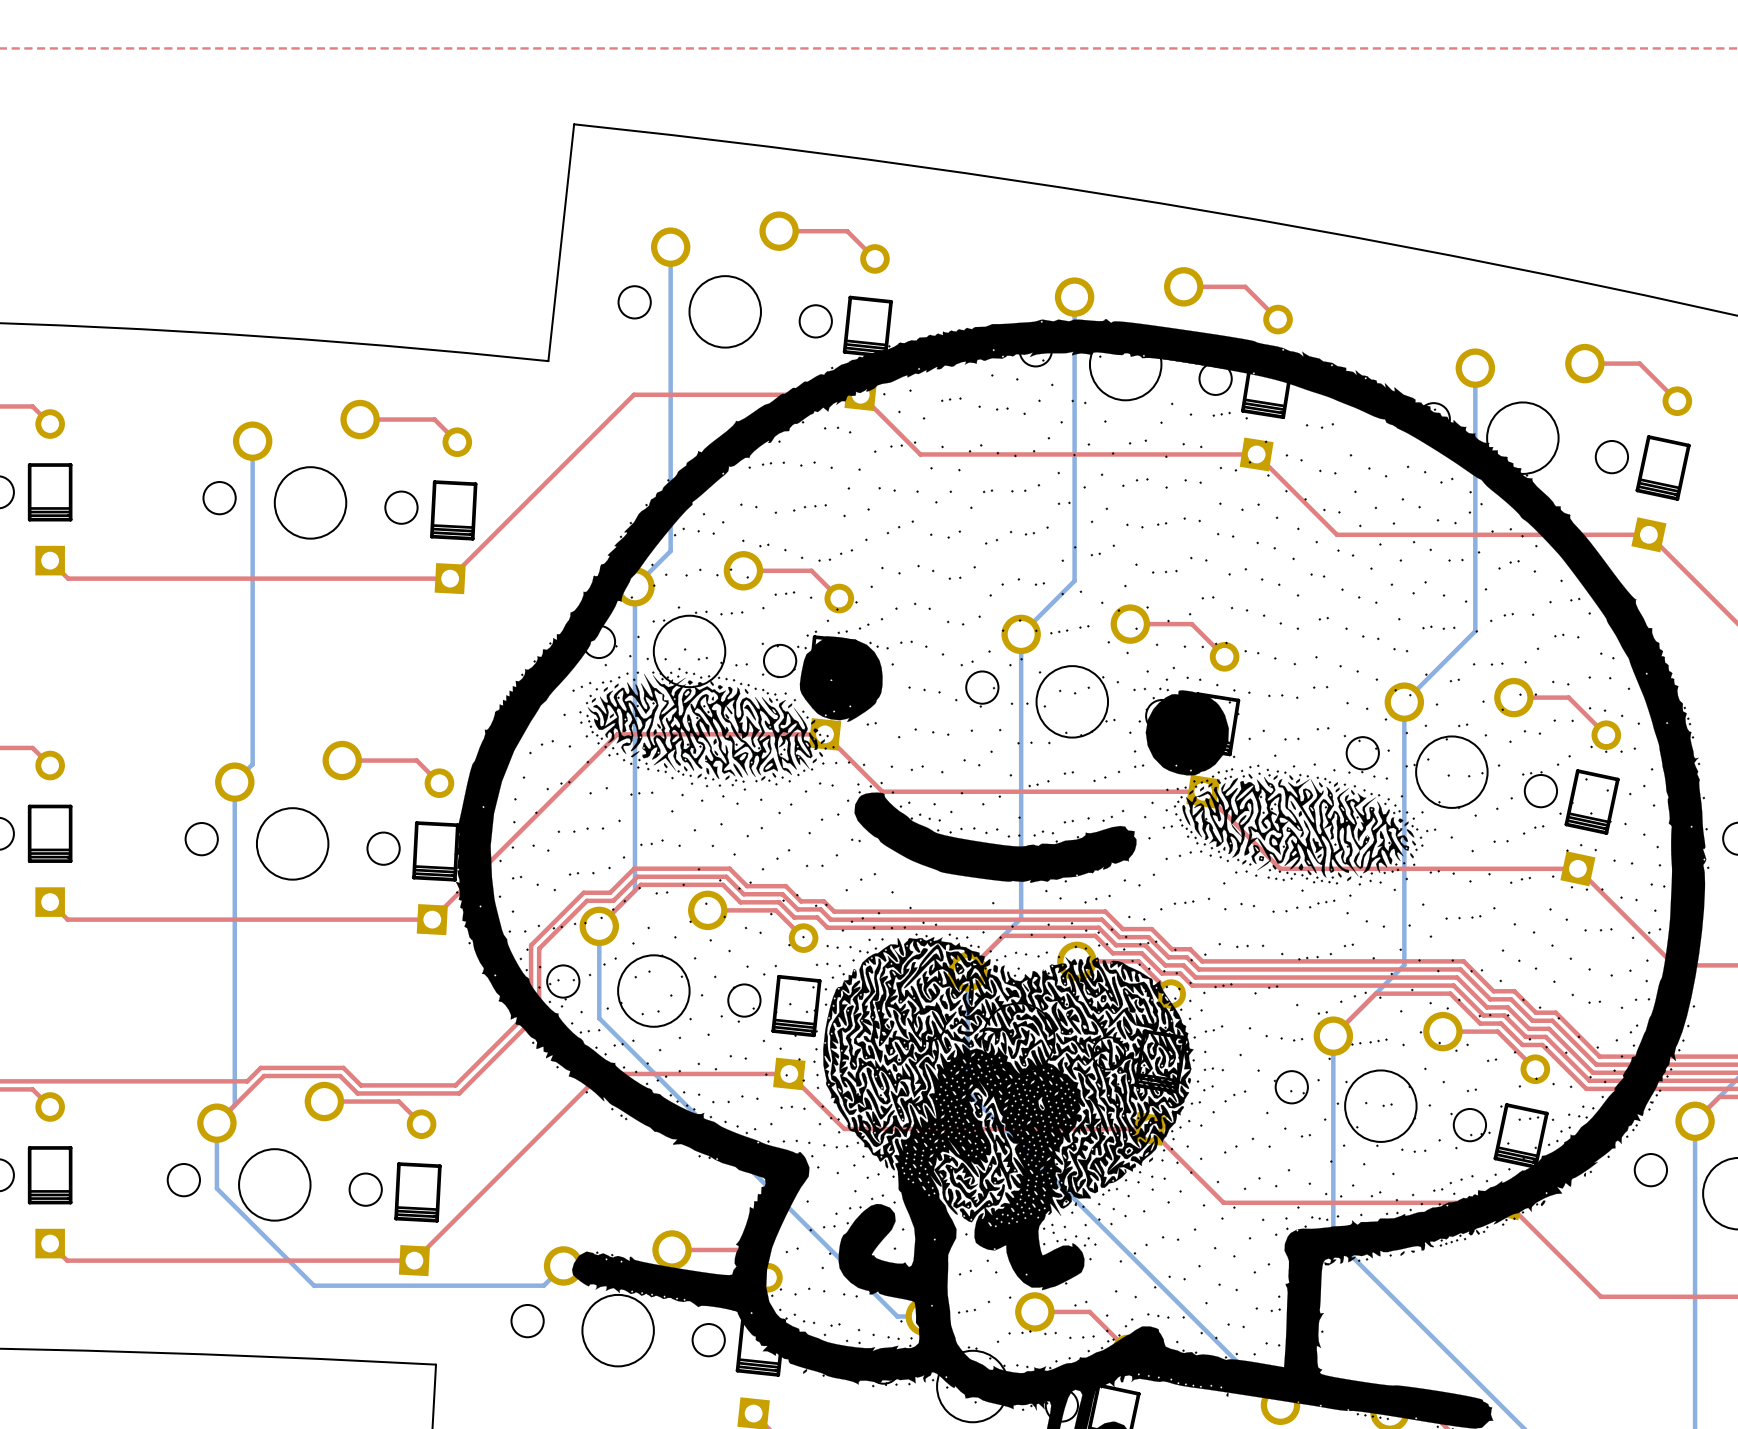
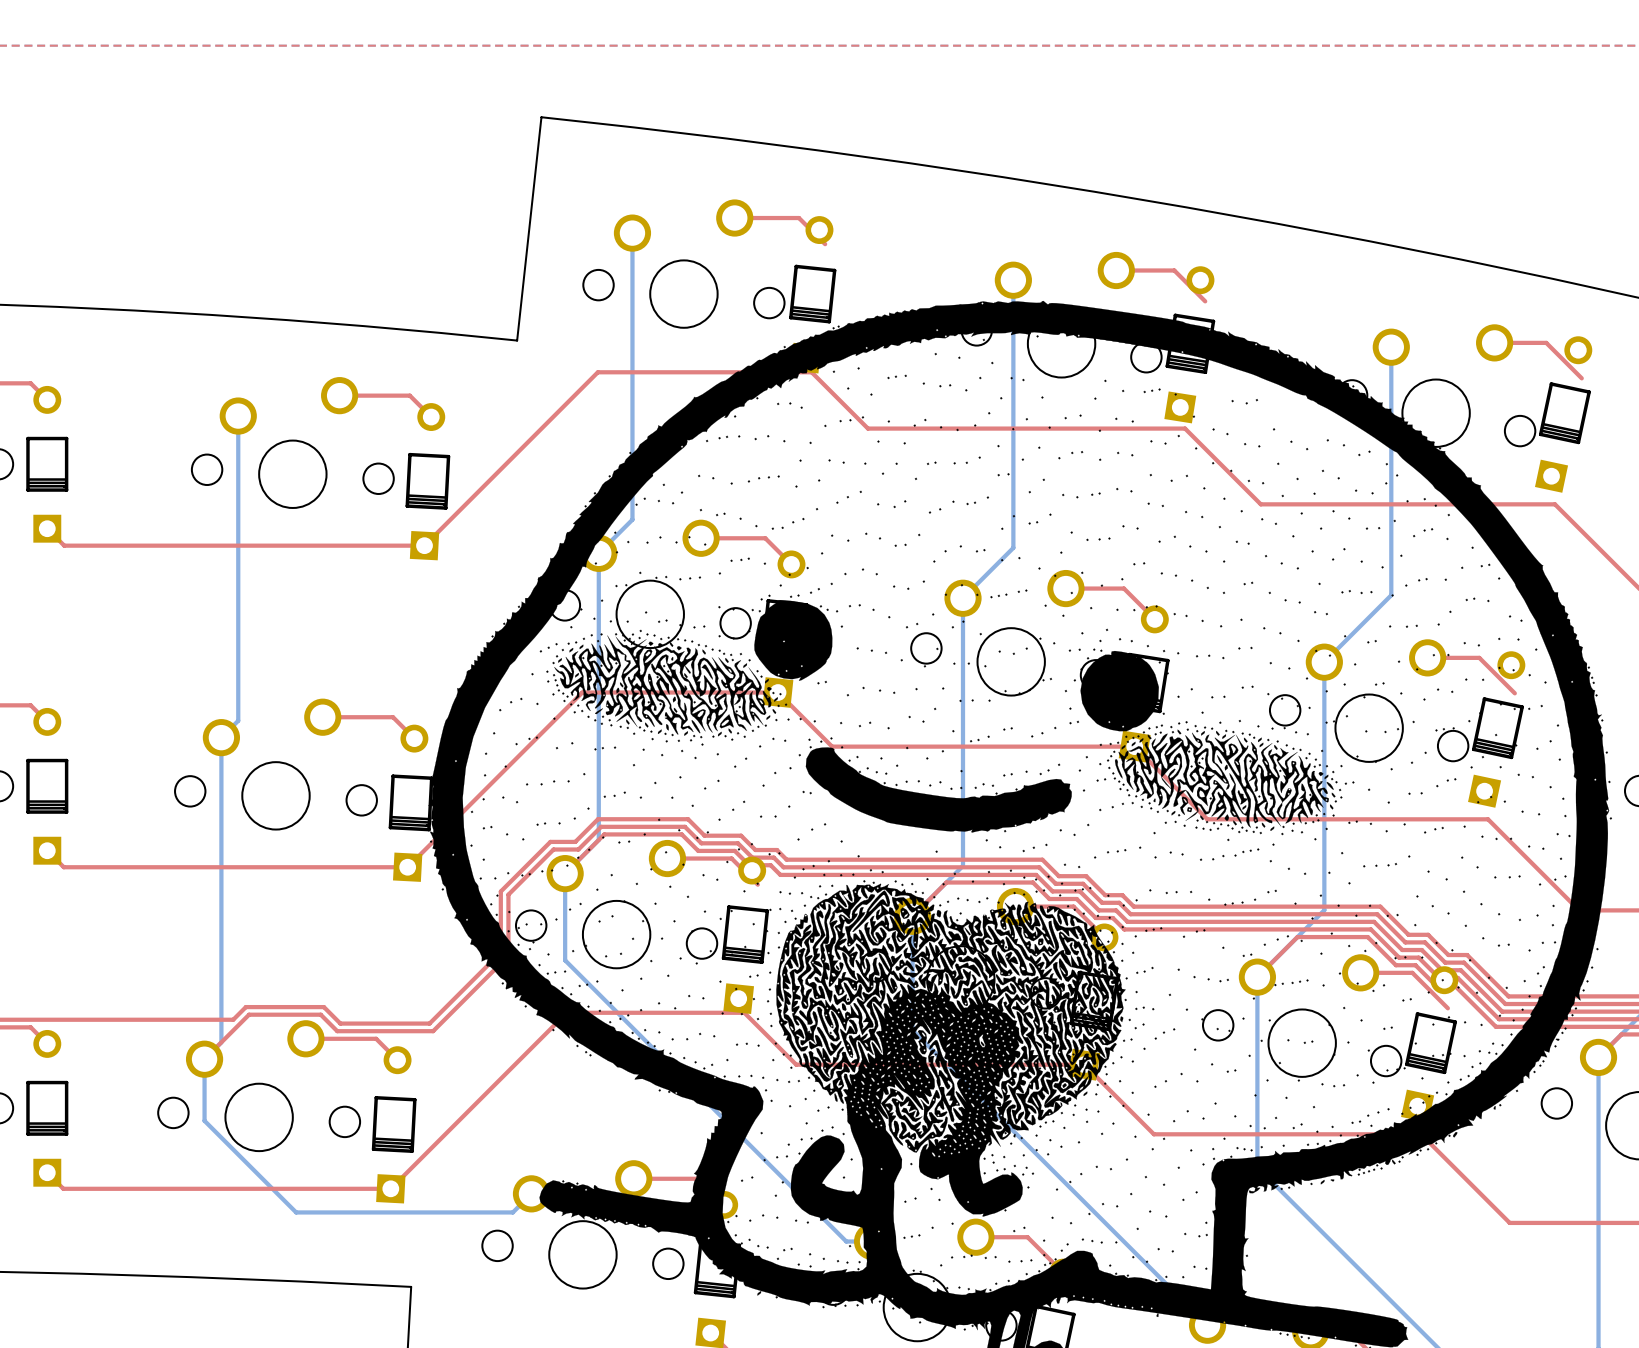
part position: (867, 327) -> (812, 294)
part position: (1266, 388) -> (1189, 344)
part position: (1661, 469) -> (1563, 414)
part position: (1590, 803) -> (1496, 729)
part position: (796, 1006) -> (745, 935)
part position: (1519, 1137) -> (1429, 1044)

